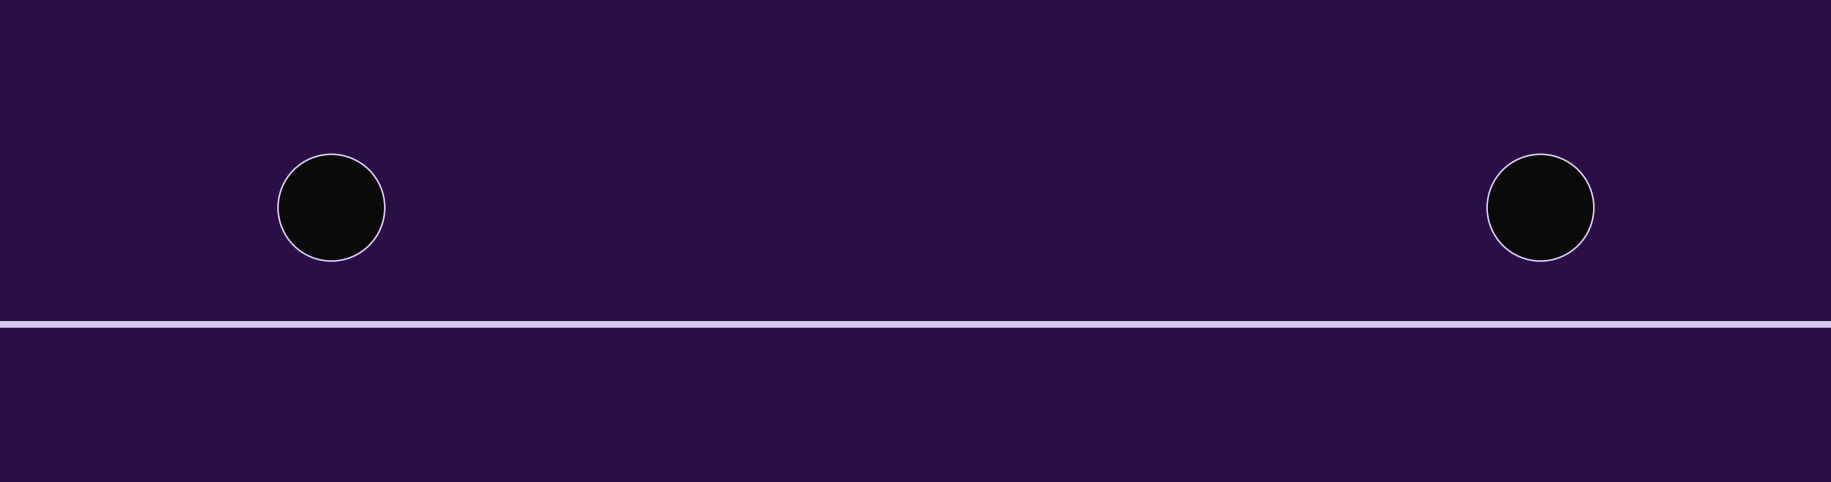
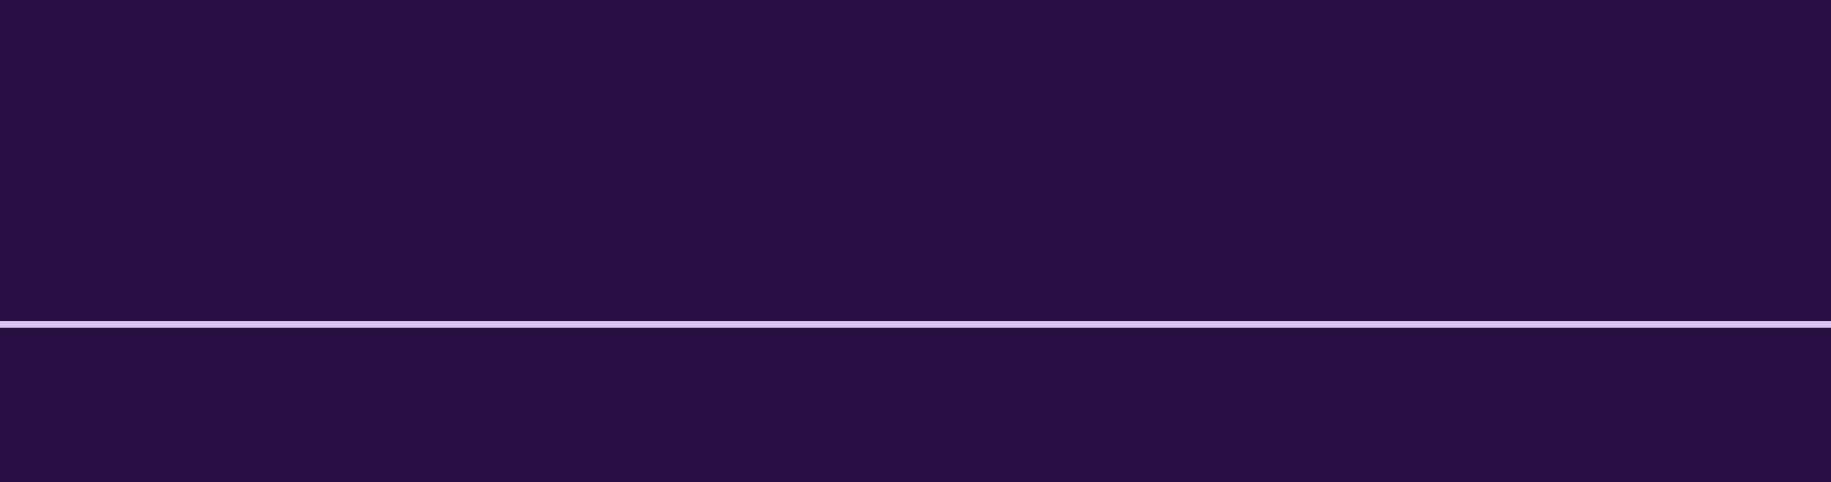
part: (331, 207) -> none
part: (1540, 207) -> none

